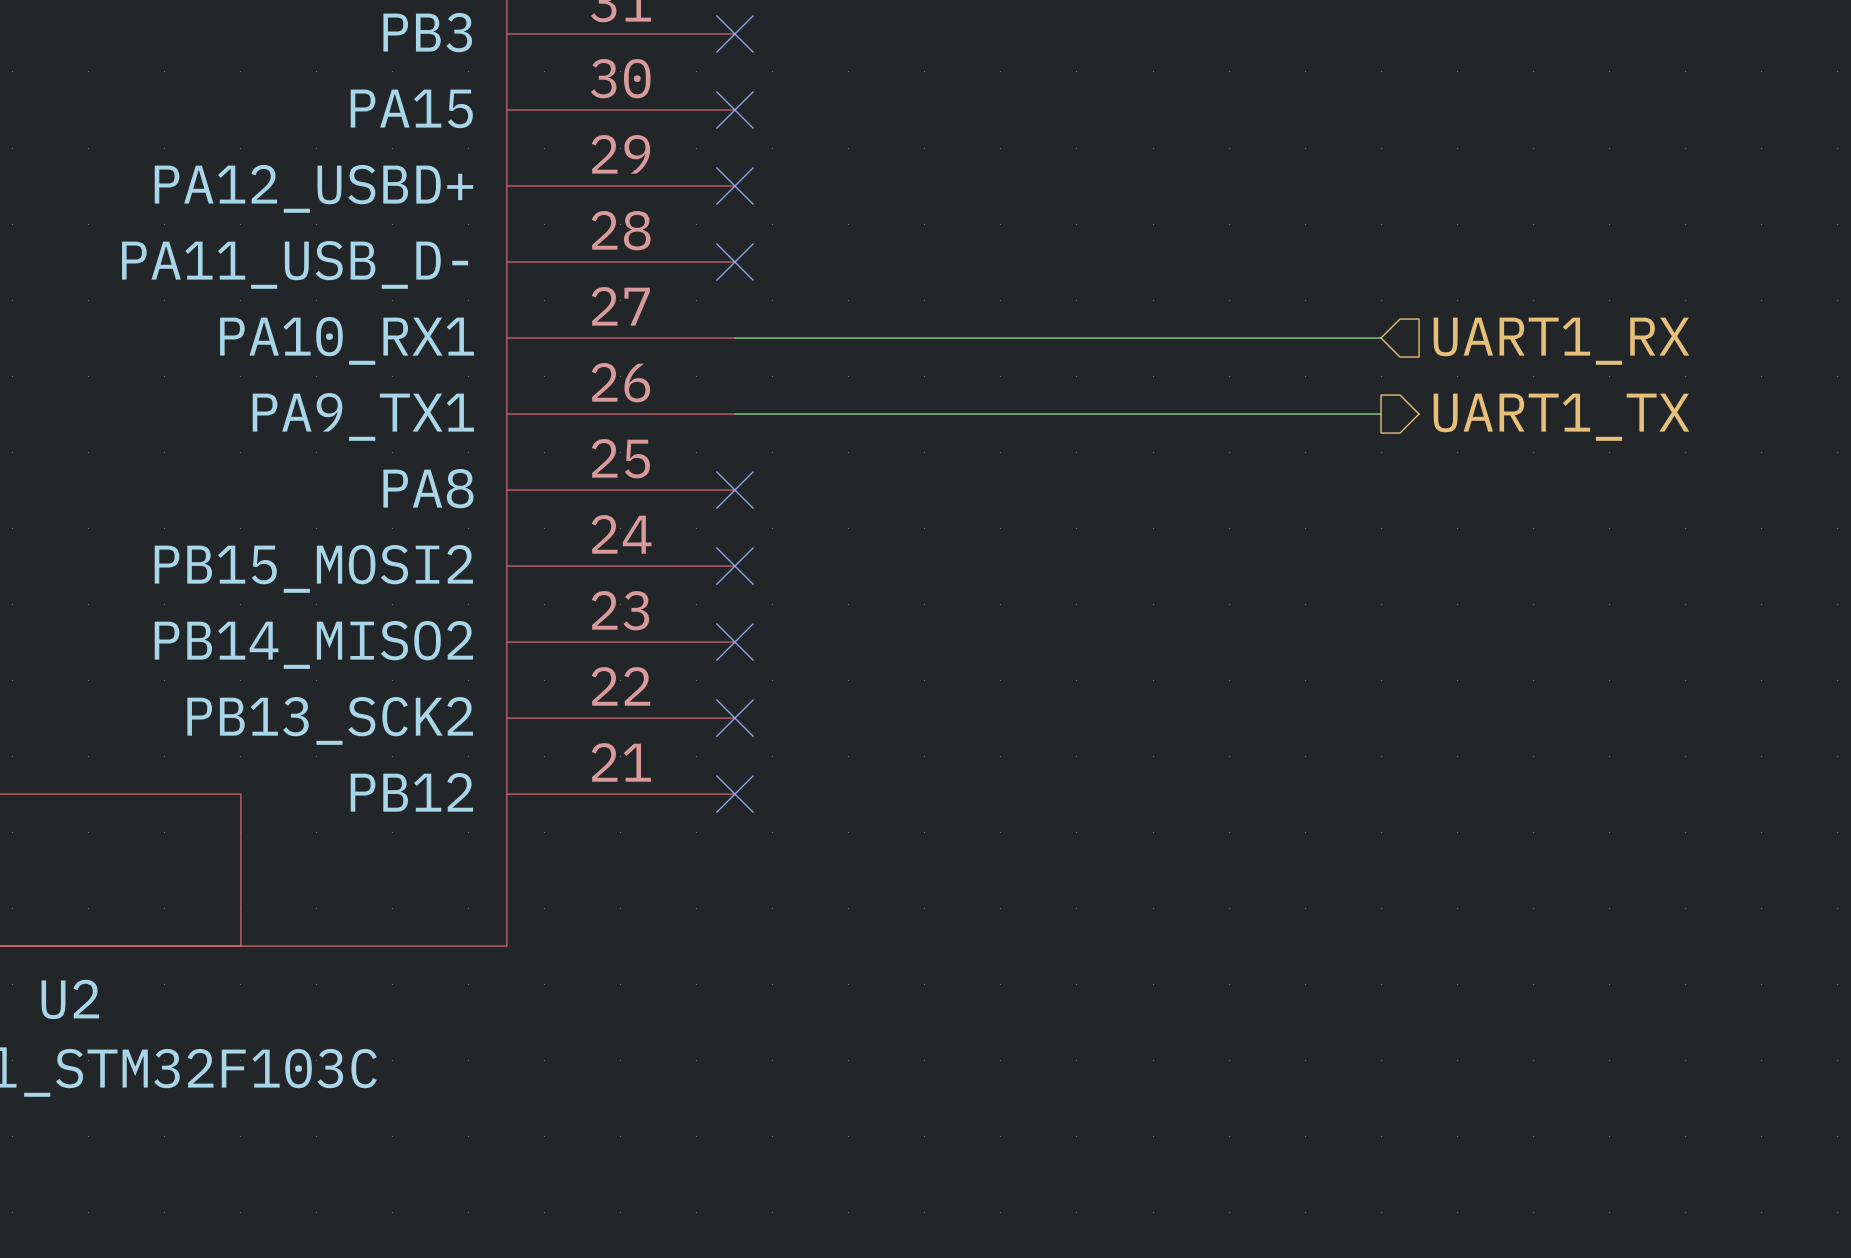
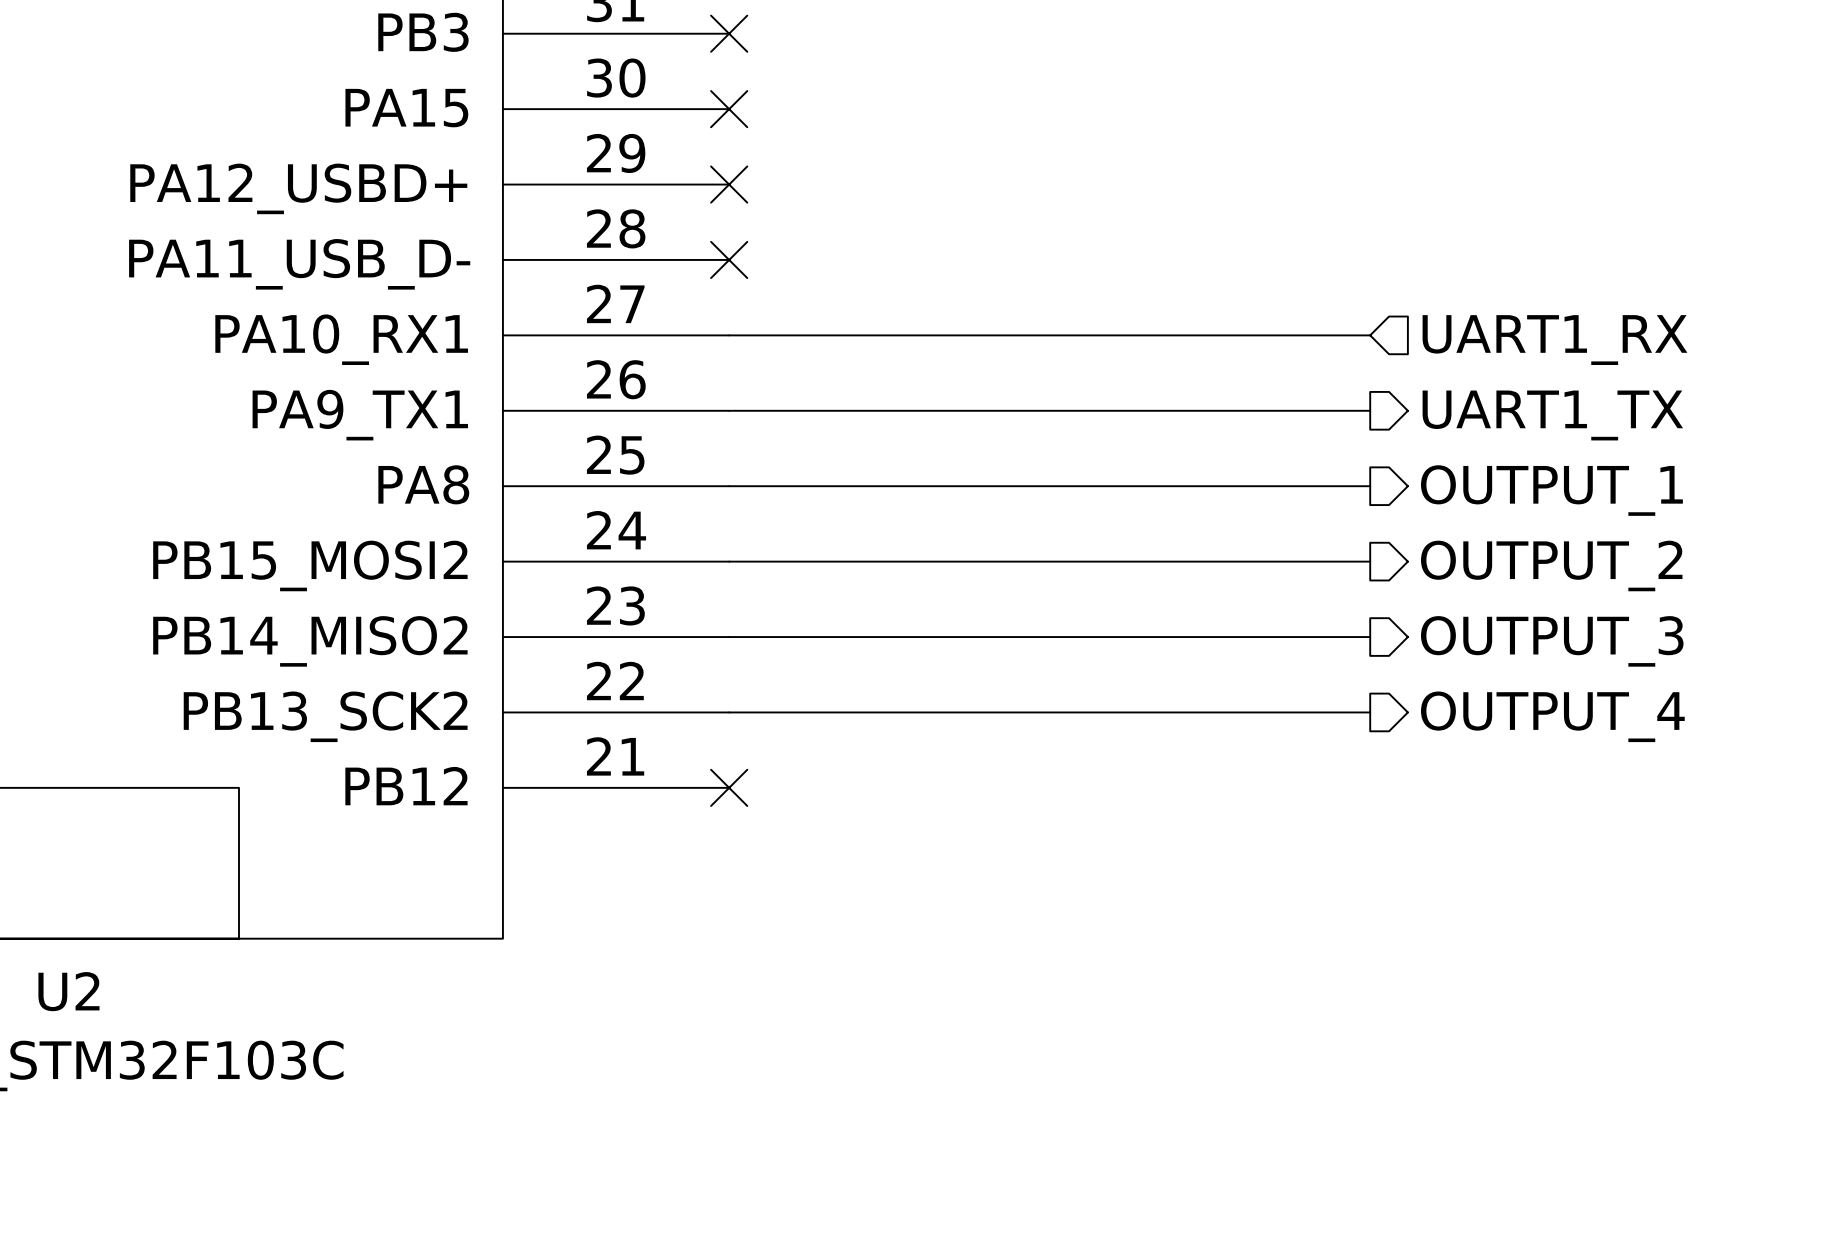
wire: none -> (729, 486) (1370, 486)
no-connect mark: (734, 490) -> none
hierarchical label: none -> OUTPUT_1 (1551, 490)
wire: none -> (729, 561) (1370, 561)
no-connect mark: (734, 566) -> none
hierarchical label: none -> OUTPUT_2 (1551, 565)
wire: none -> (729, 637) (1370, 637)
no-connect mark: (734, 642) -> none
hierarchical label: none -> OUTPUT_3 (1552, 641)
wire: none -> (729, 712) (1370, 712)
no-connect mark: (734, 718) -> none
hierarchical label: none -> OUTPUT_4 (1552, 716)

